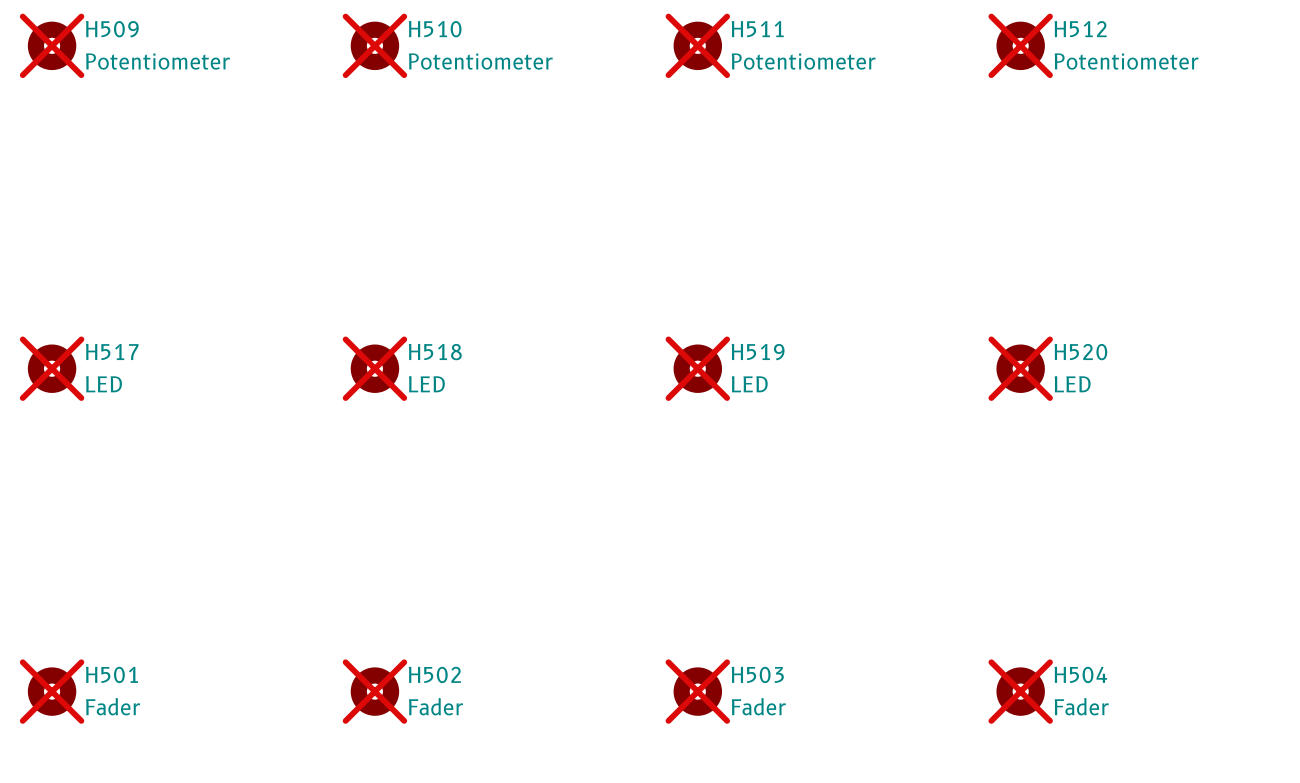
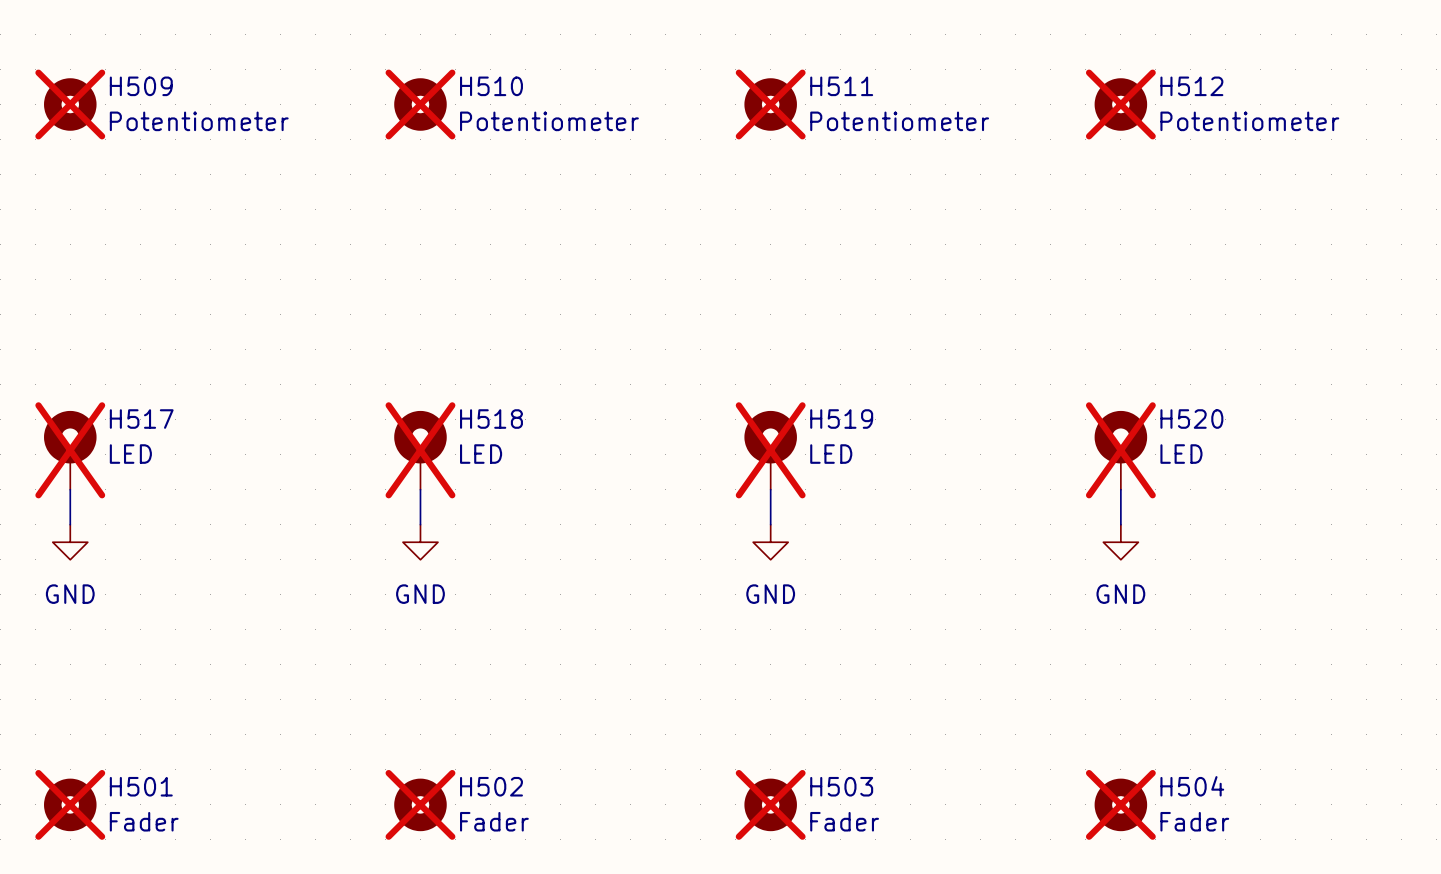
H517 symbol: [27, 344, 77, 393] -> [44, 410, 97, 490]
H518 symbol: [350, 344, 400, 393] -> [394, 410, 447, 490]
H519 symbol: [673, 344, 723, 393] -> [744, 410, 797, 490]
H520 symbol: [996, 344, 1045, 393] -> [1094, 410, 1148, 490]
wire: none -> (70, 489) (70, 524)
wire: none -> (420, 489) (420, 524)
wire: none -> (770, 489) (770, 524)
wire: none -> (1120, 489) (1120, 524)
power symbol: none -> GND (70, 542)
power symbol: none -> GND (420, 542)
power symbol: none -> GND (770, 542)
power symbol: none -> GND (1120, 542)

